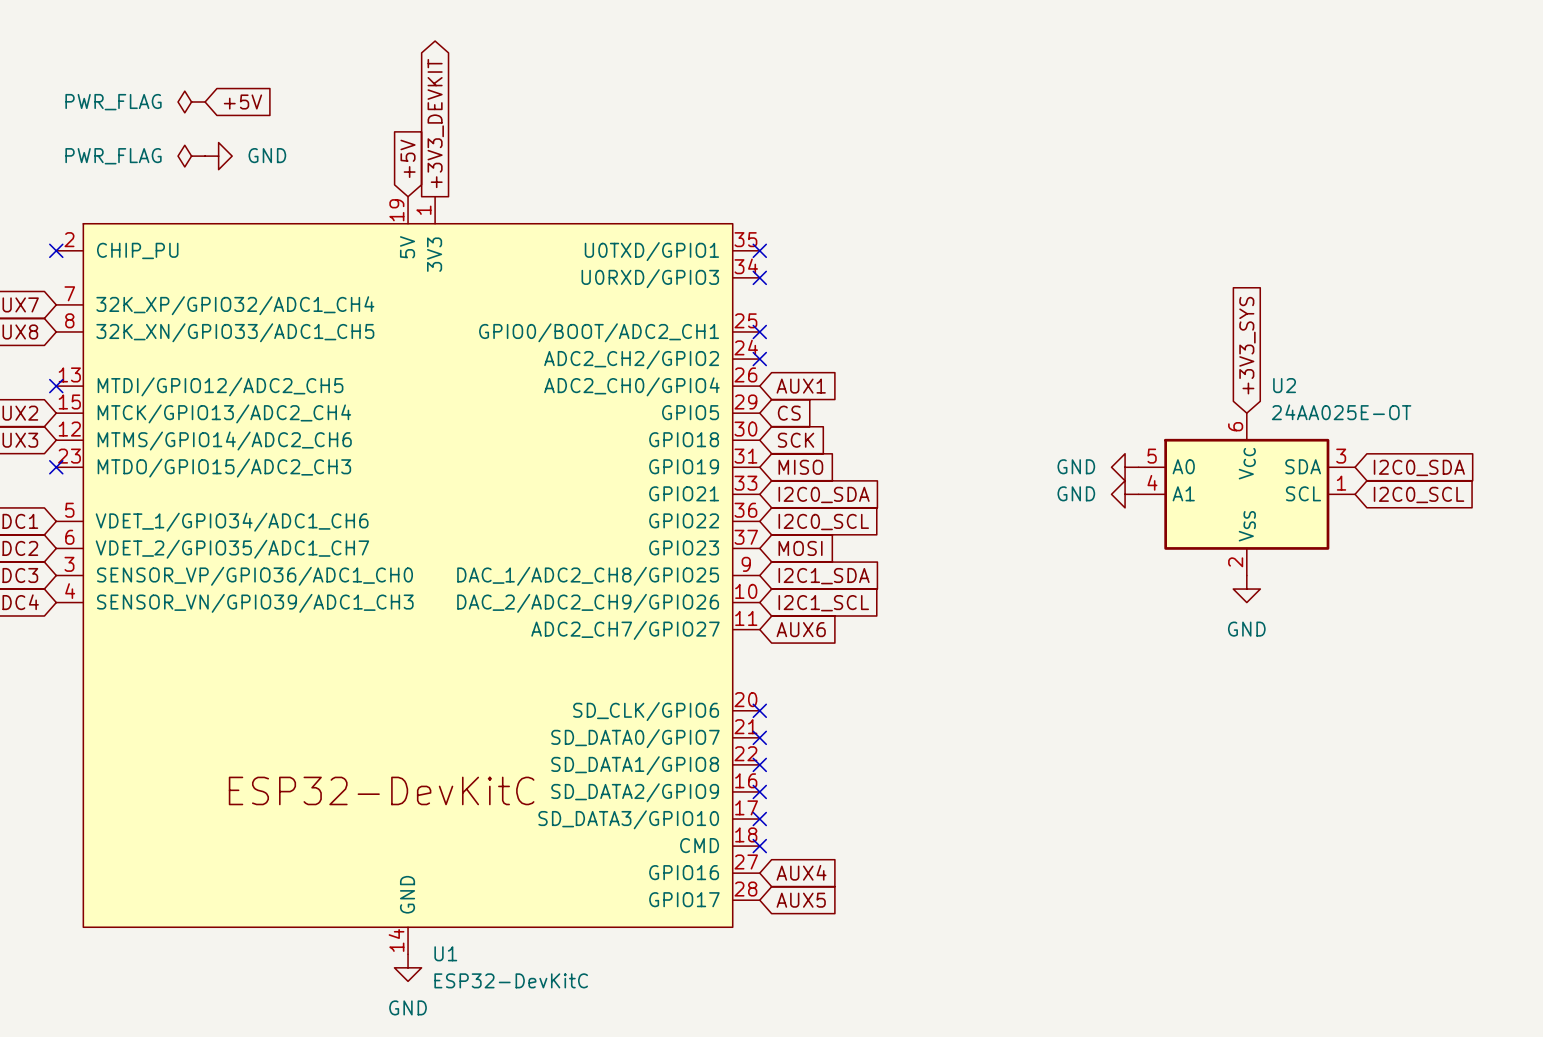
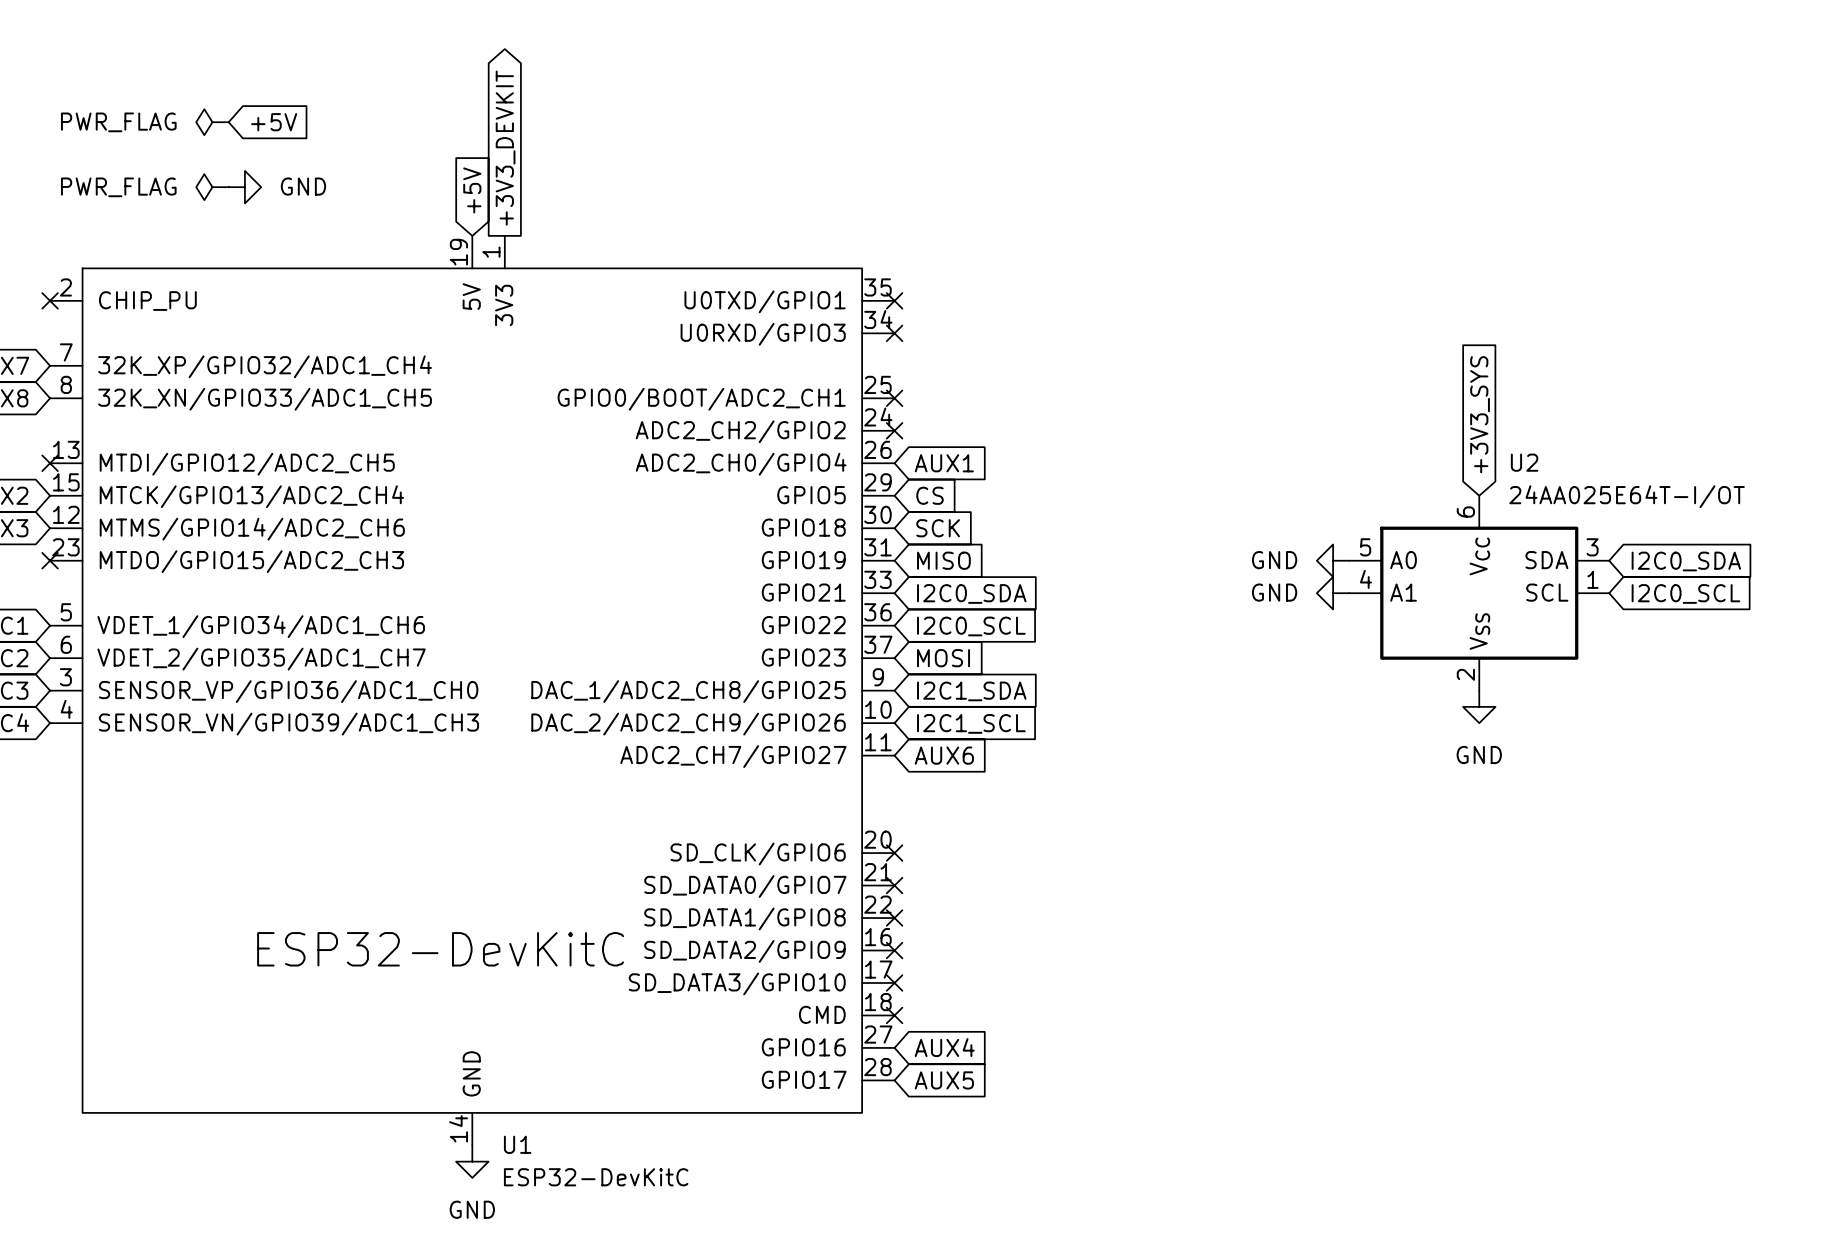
U2 value: 24AA025E-OT (1341, 412) -> 24AA025E64T-I/OT (1627, 496)

